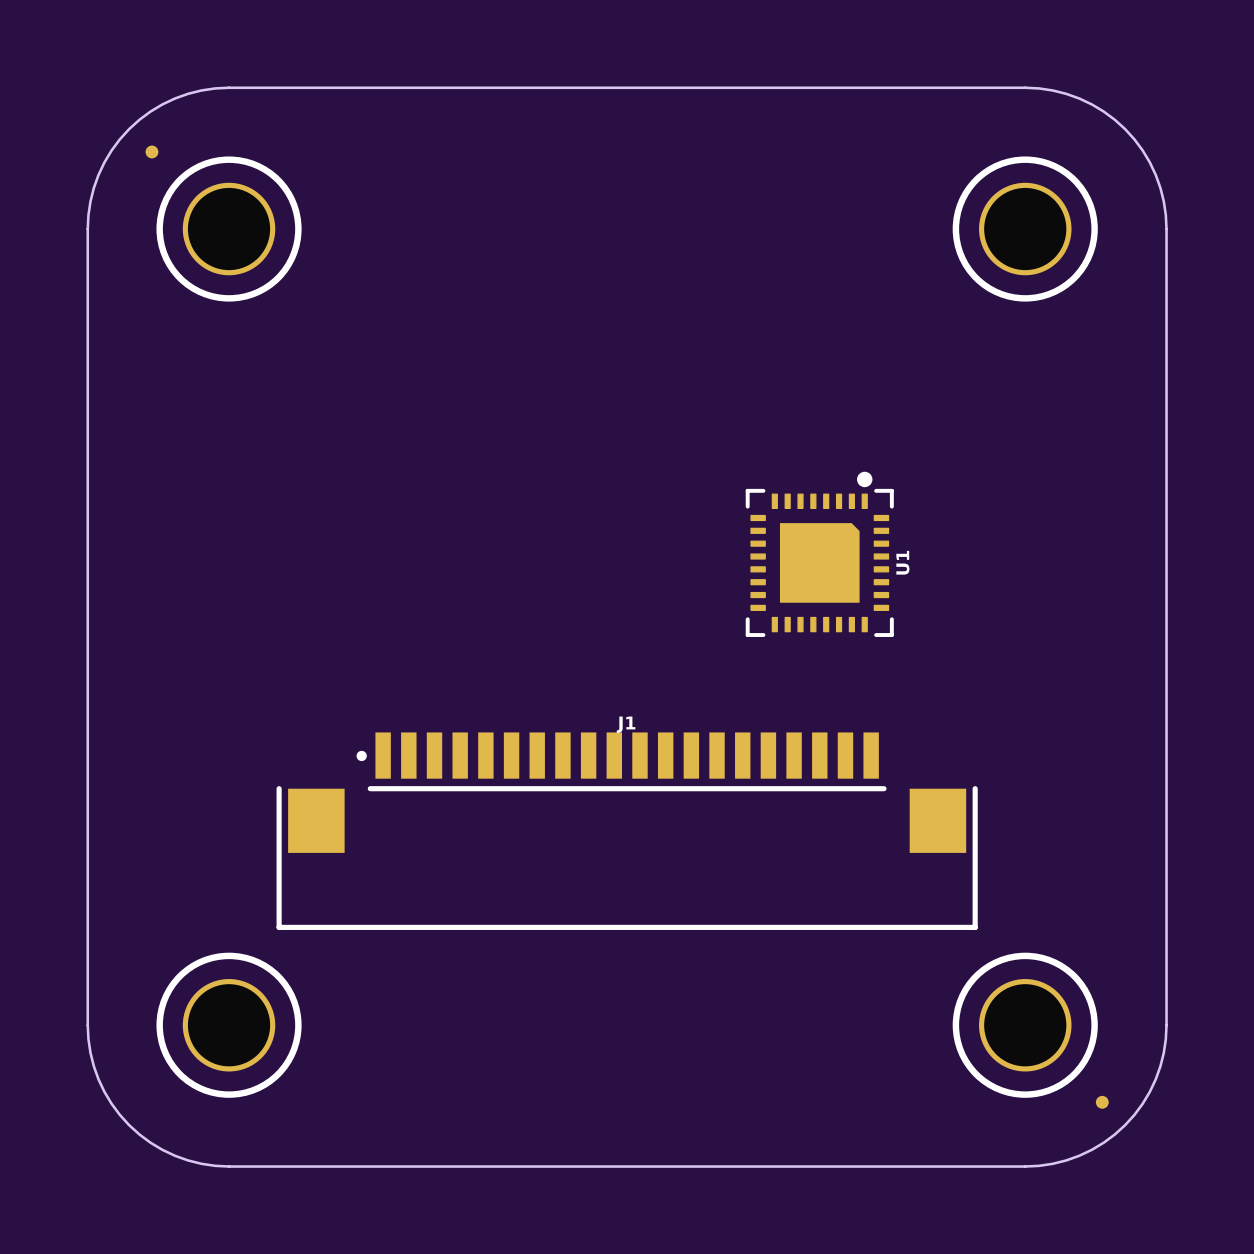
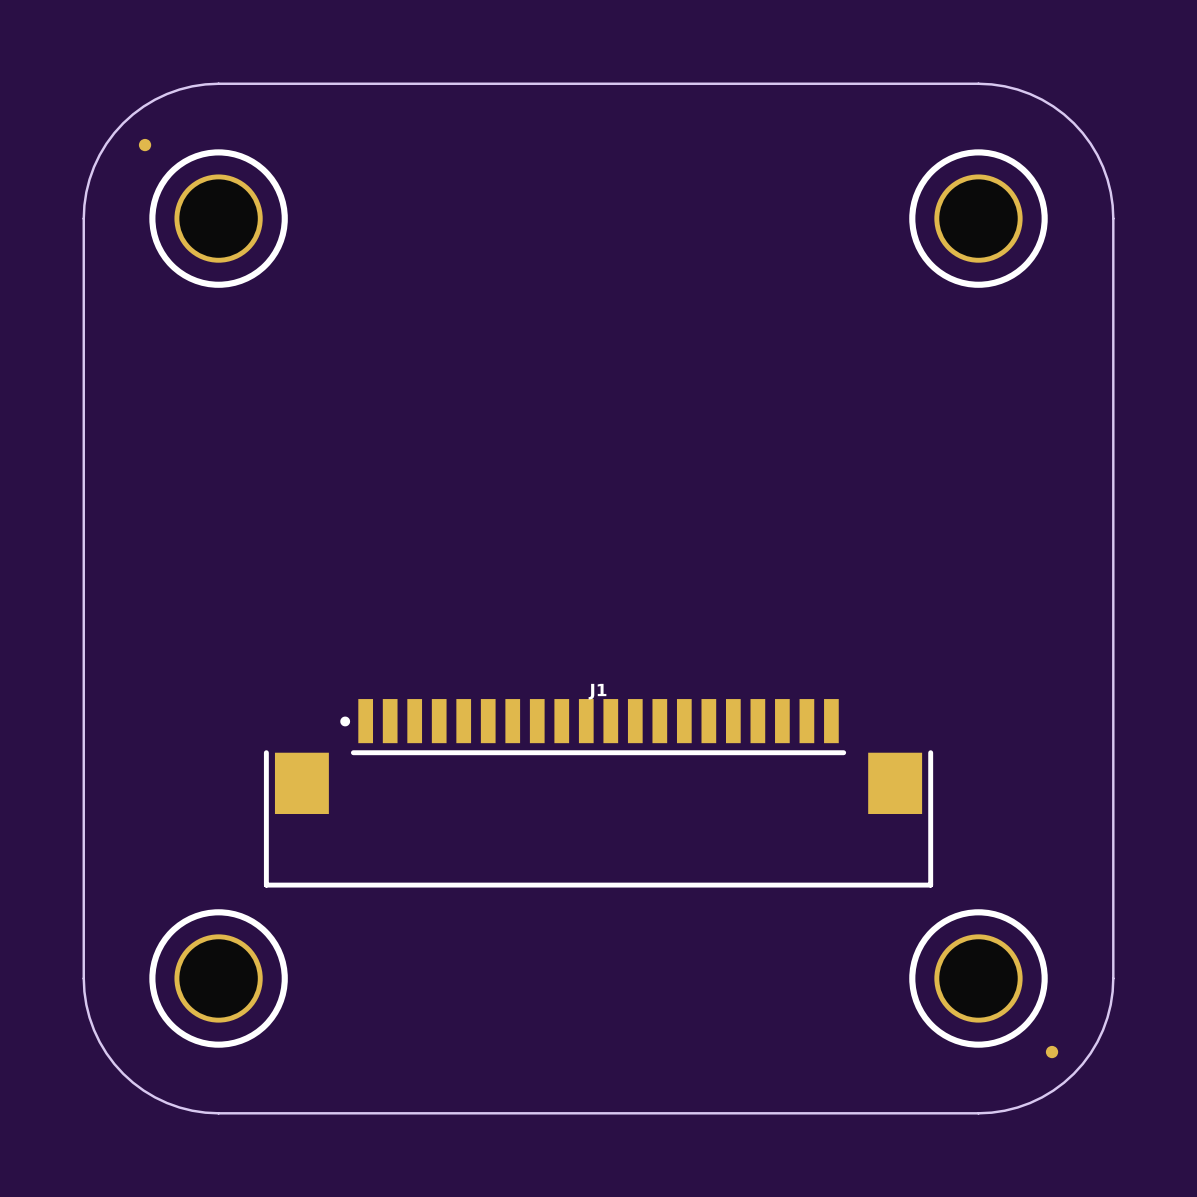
U1: (819, 554) -> none

